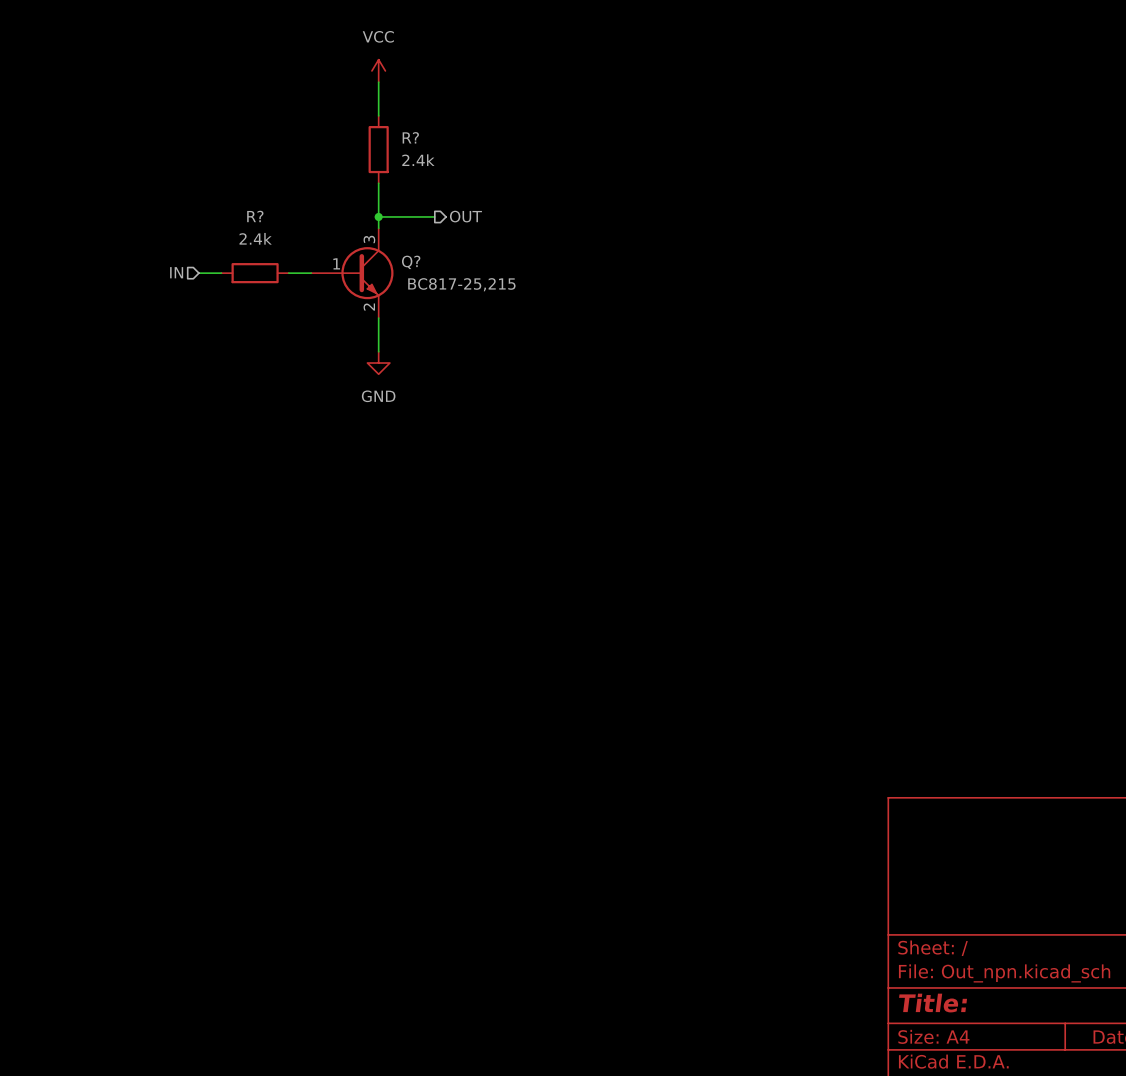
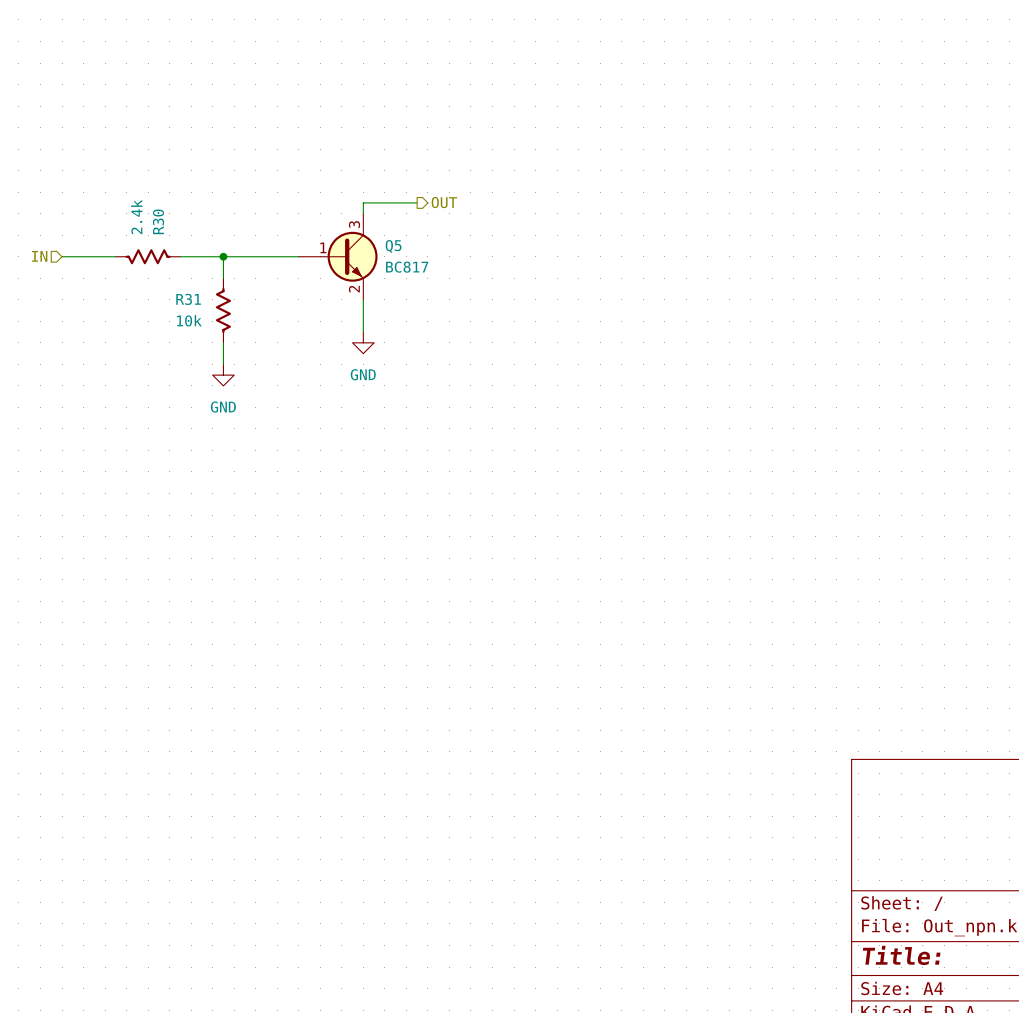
power symbol: VCC (378, 70) -> none
wire: (378, 82) (378, 115) -> none
R?: 2.4k (378, 149) -> none
wire: (378, 183) (378, 216) -> none
junction: (378, 216) -> none
Q? name: Q? (411, 262) -> Q5 (393, 246)
hierarchical label position: IN (176, 272) -> IN (39, 256)
wire: none -> (62, 256) (115, 256)
R30: none -> 2.4k (148, 256)
wire: none -> (180, 256) (191, 256)
wire: none -> (212, 256) (277, 256)
wire: none -> (223, 256) (223, 278)
junction: none -> (223, 256)
R?: 2.4k (255, 273) -> none
Q? value: none -> BC817 (407, 267)
Q? text: BC817-25,215 (461, 284) -> none
R31: none -> 10k (223, 310)
wire: none -> (223, 342) (223, 364)
power symbol: none -> GND (223, 375)

